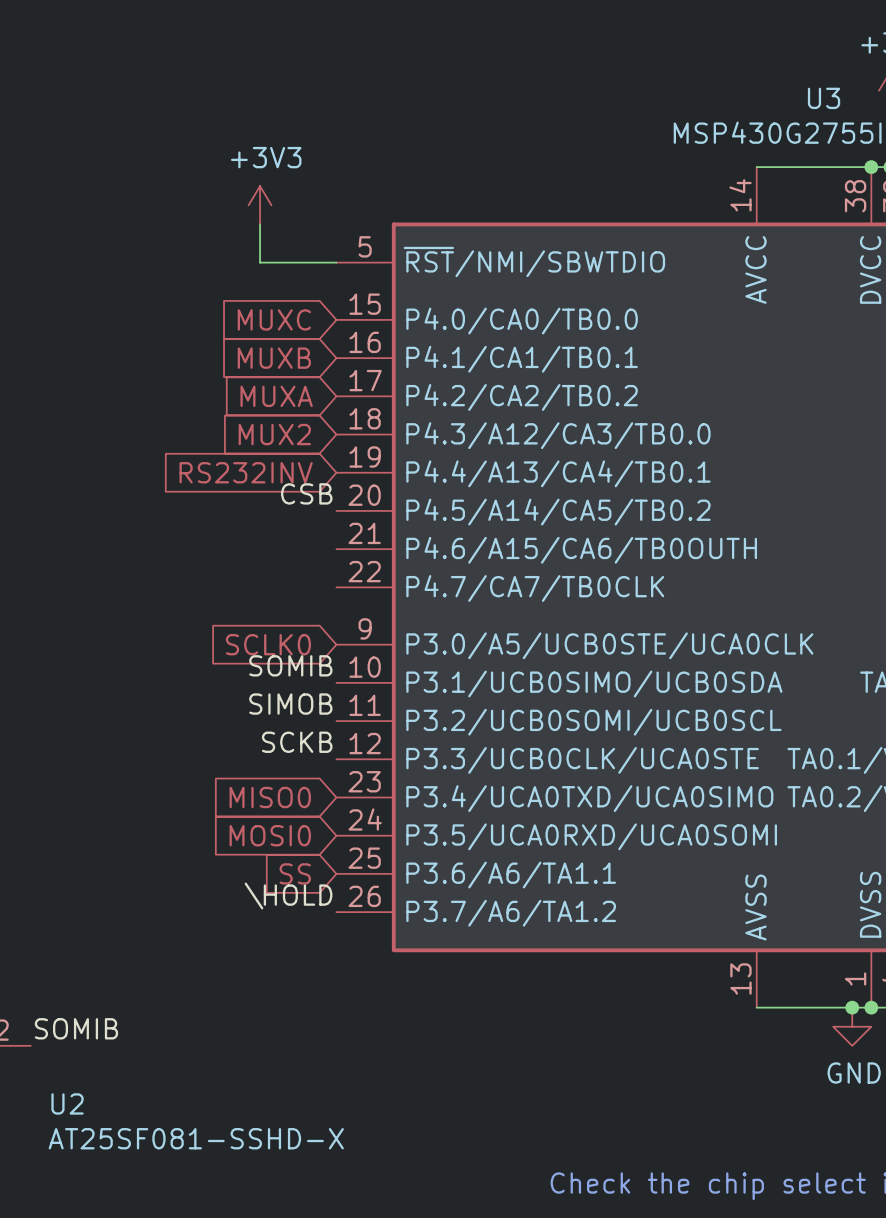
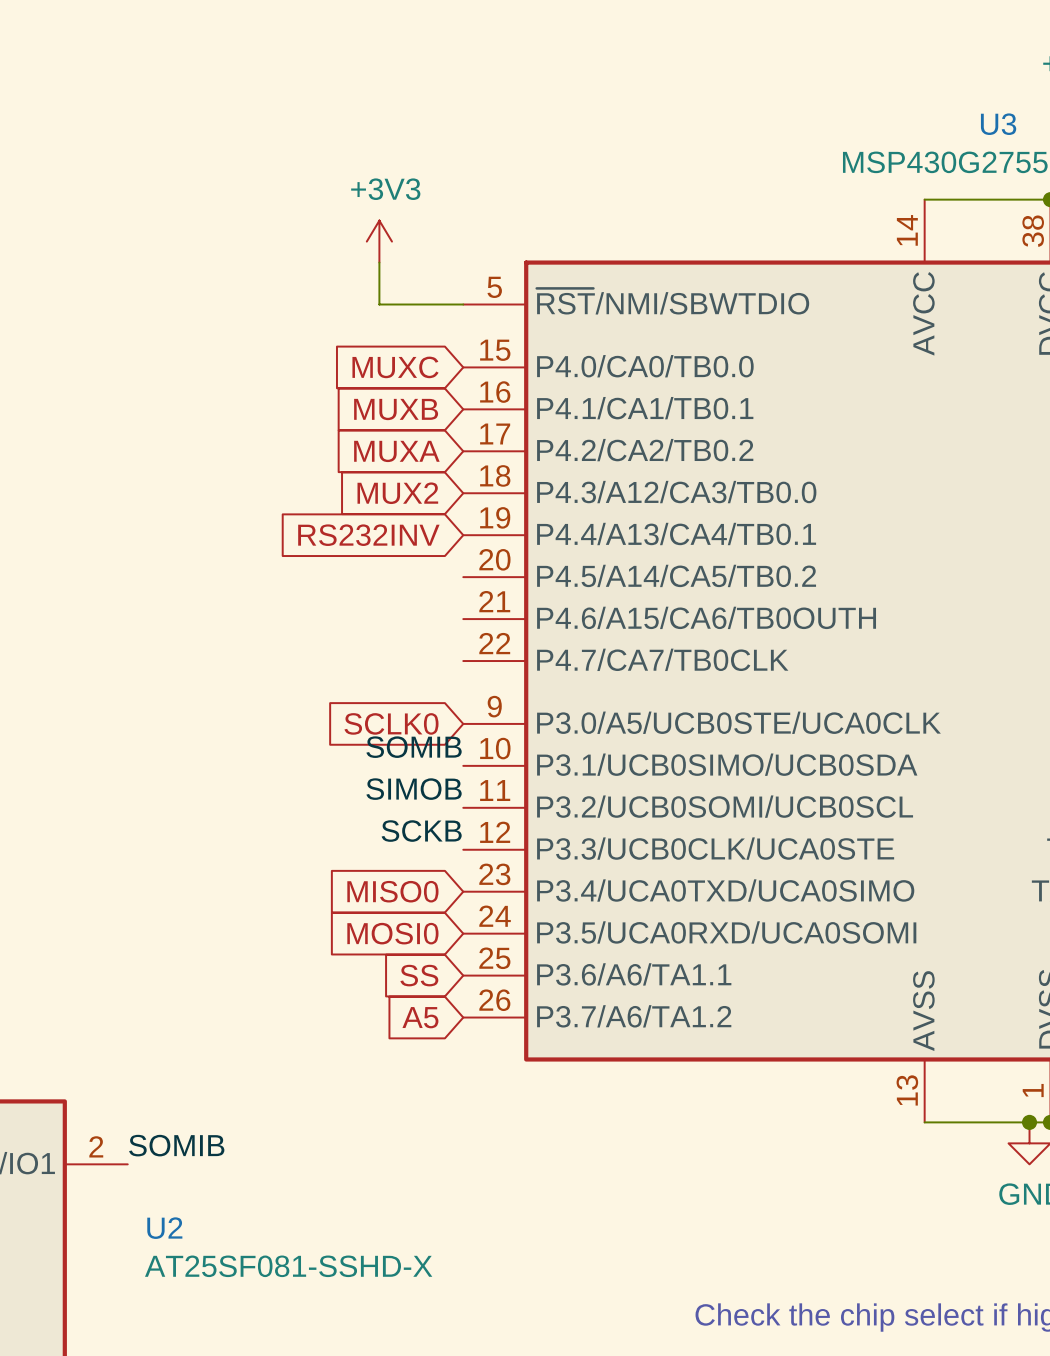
label: CSB (306, 493) -> none
label: \HOLD (288, 895) -> none
global label: none -> A5 (420, 1017)

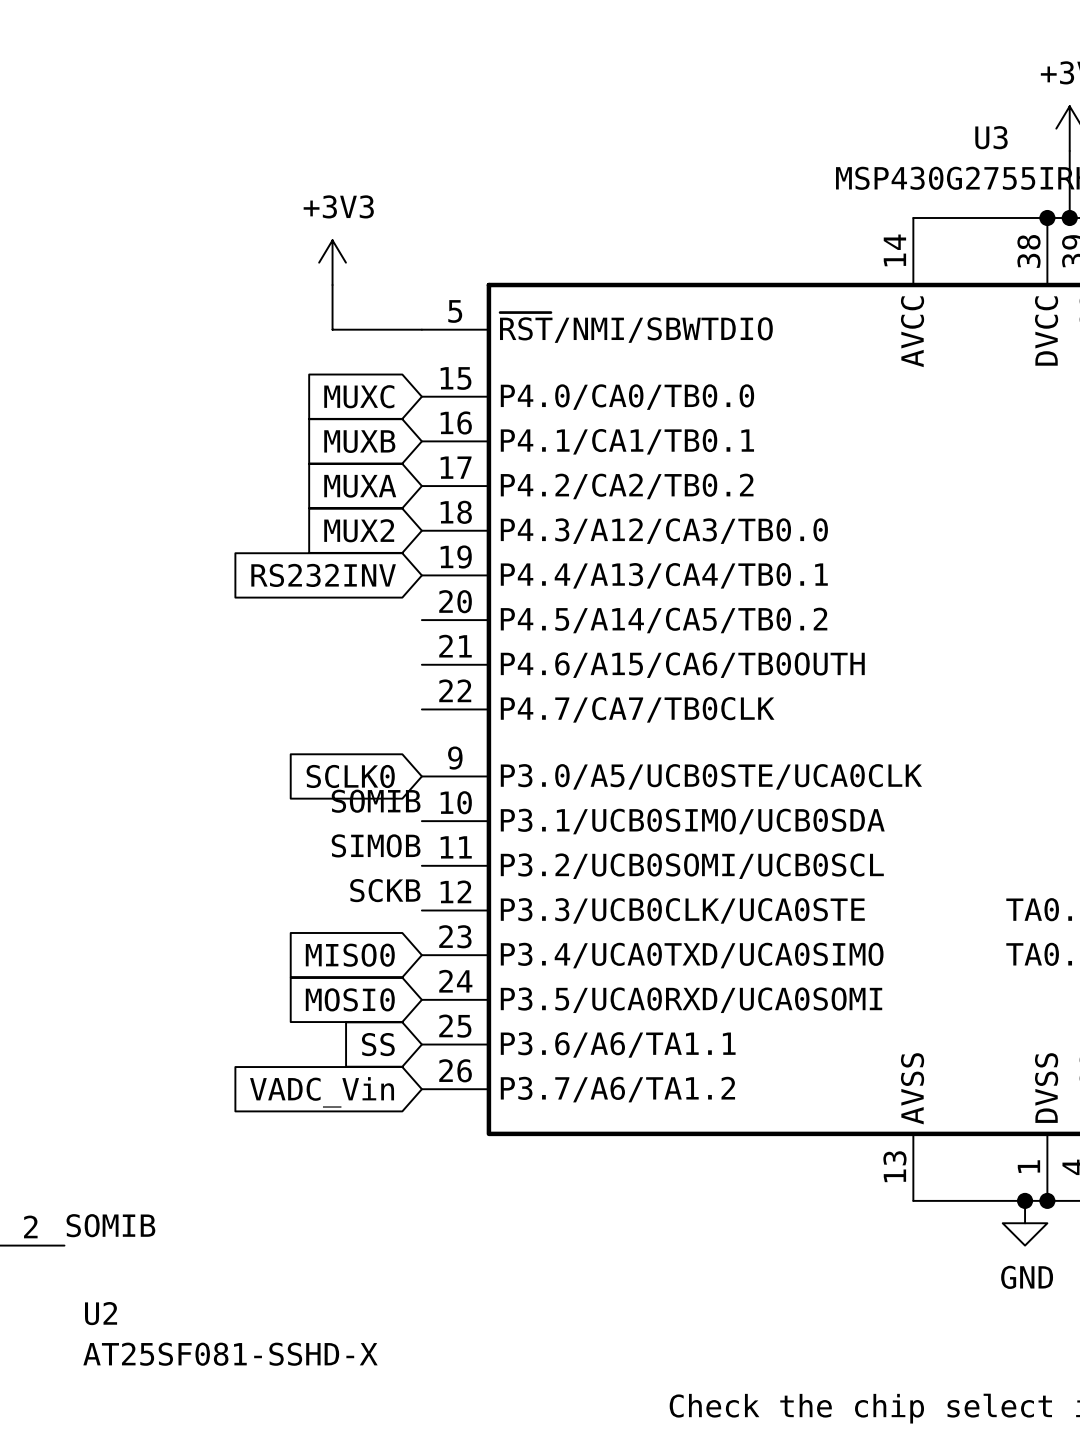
global label: A5 (420, 1017) -> VADC_Vin (322, 1092)

